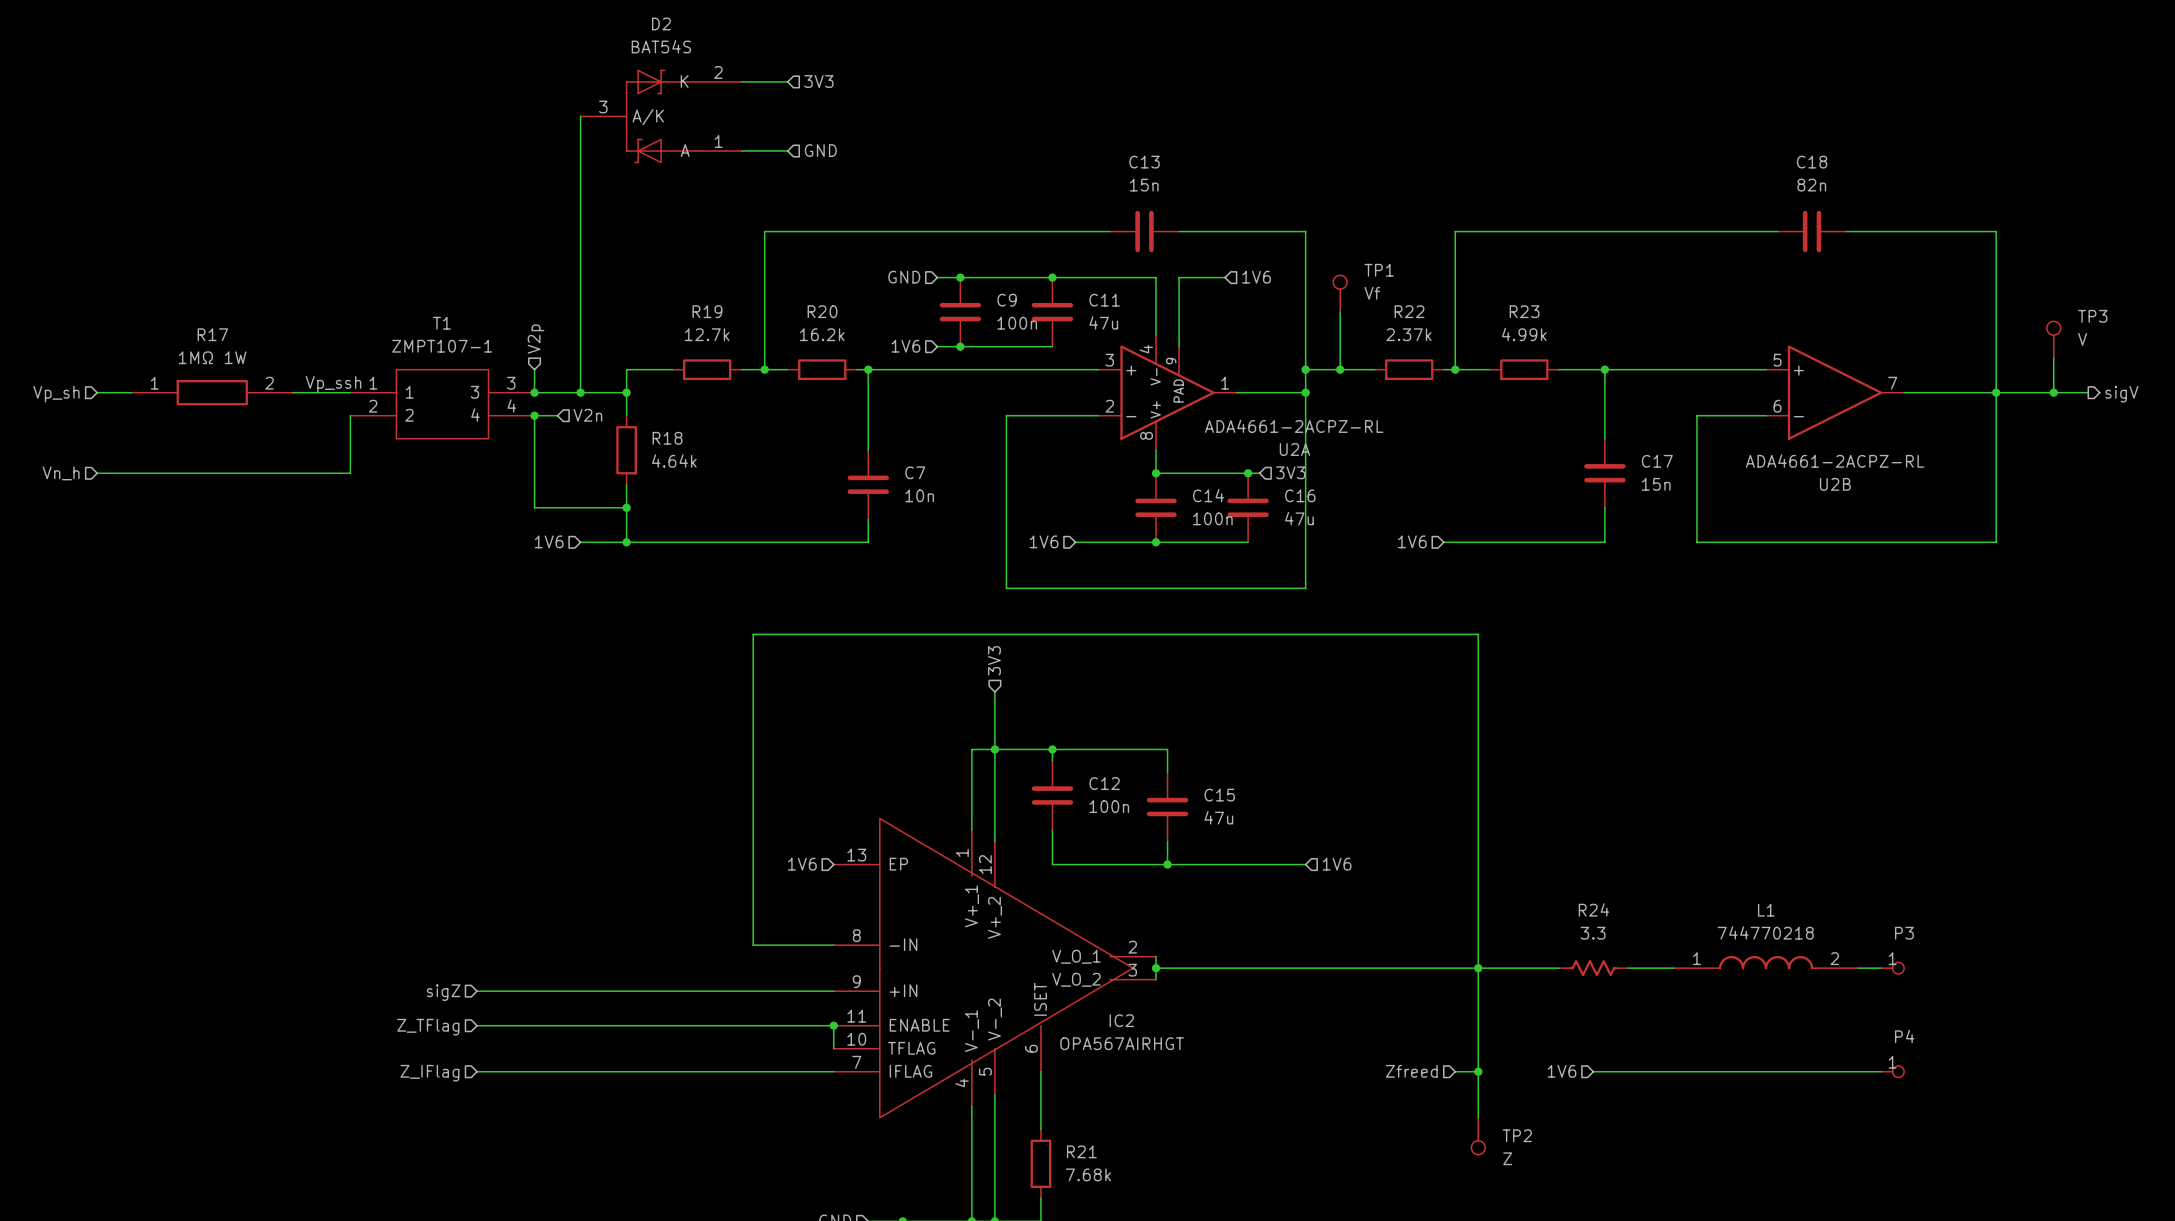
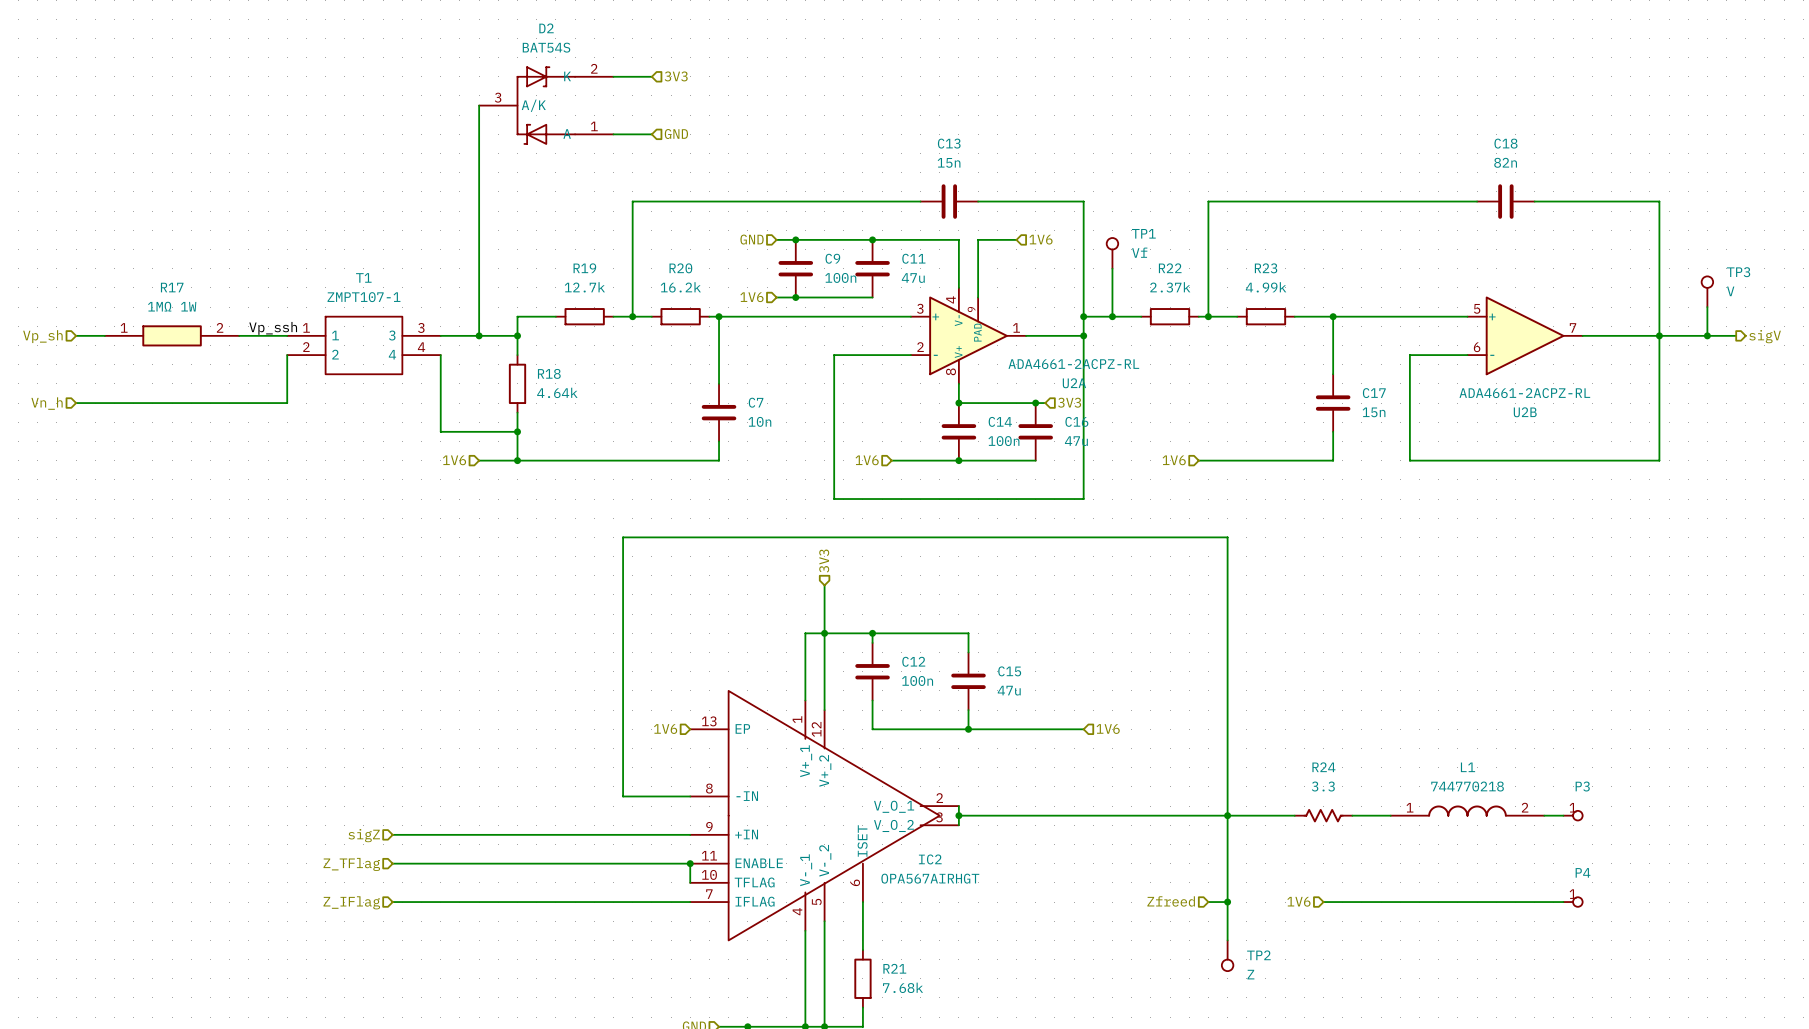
hierarchical label: V2p (536, 339) -> none
wire: (534, 369) (534, 392) -> none
junction: (534, 392) -> none
wire: (534, 415) (557, 415) -> none
junction: (534, 415) -> none
hierarchical label: V2n (587, 415) -> none

